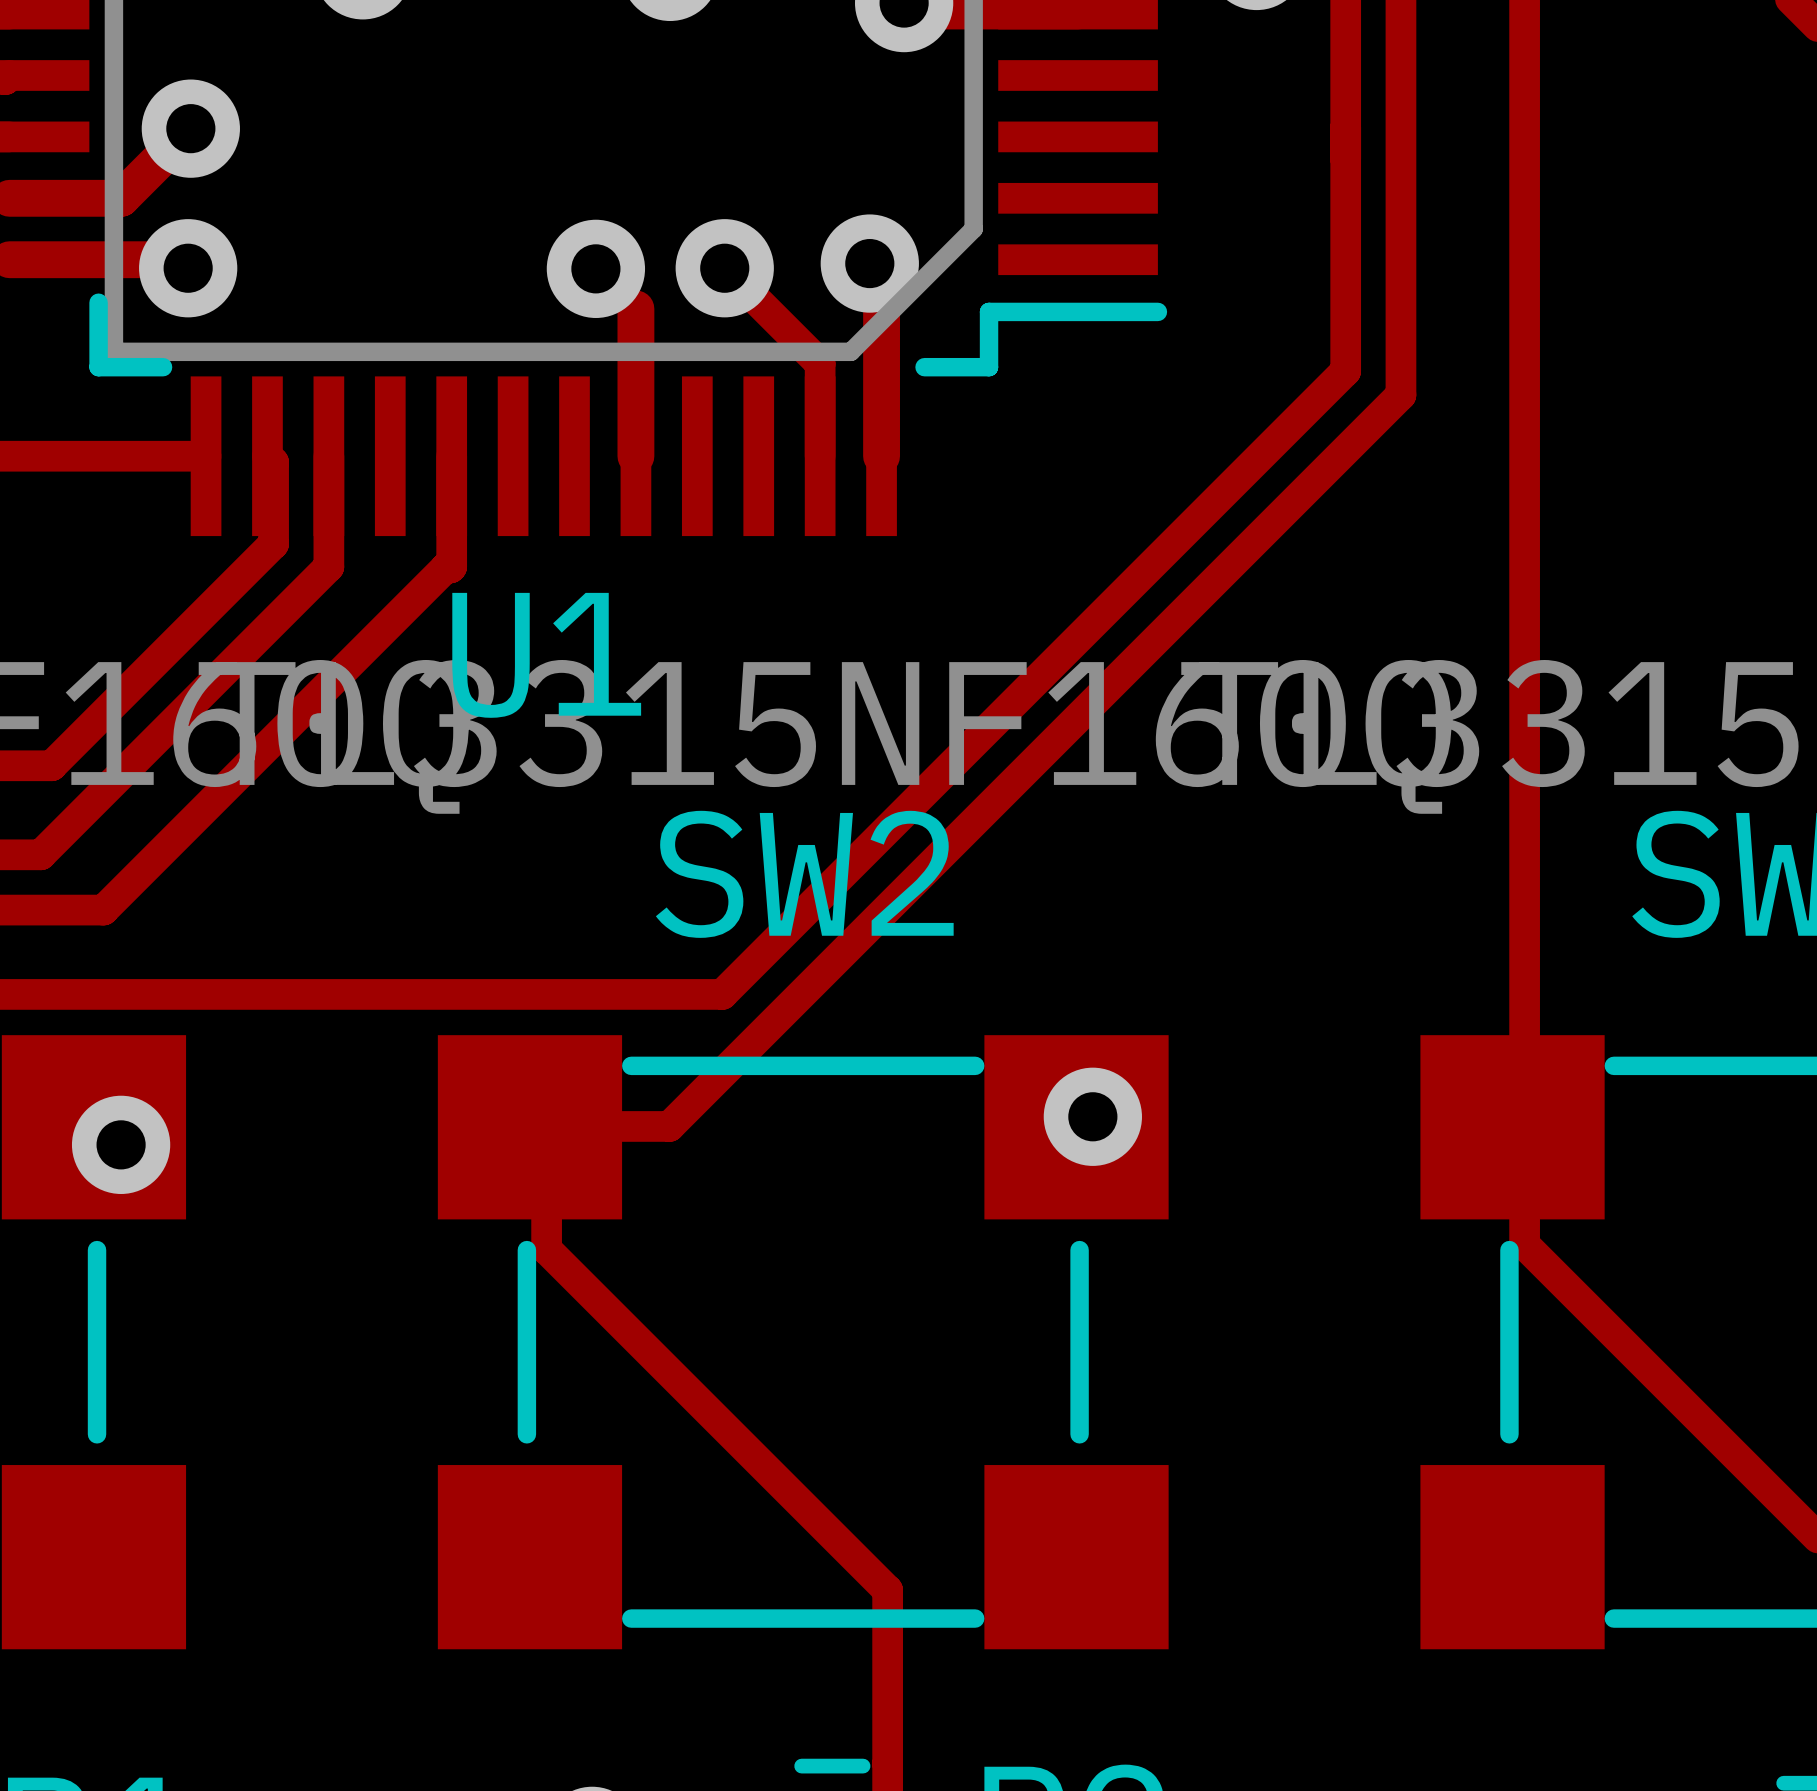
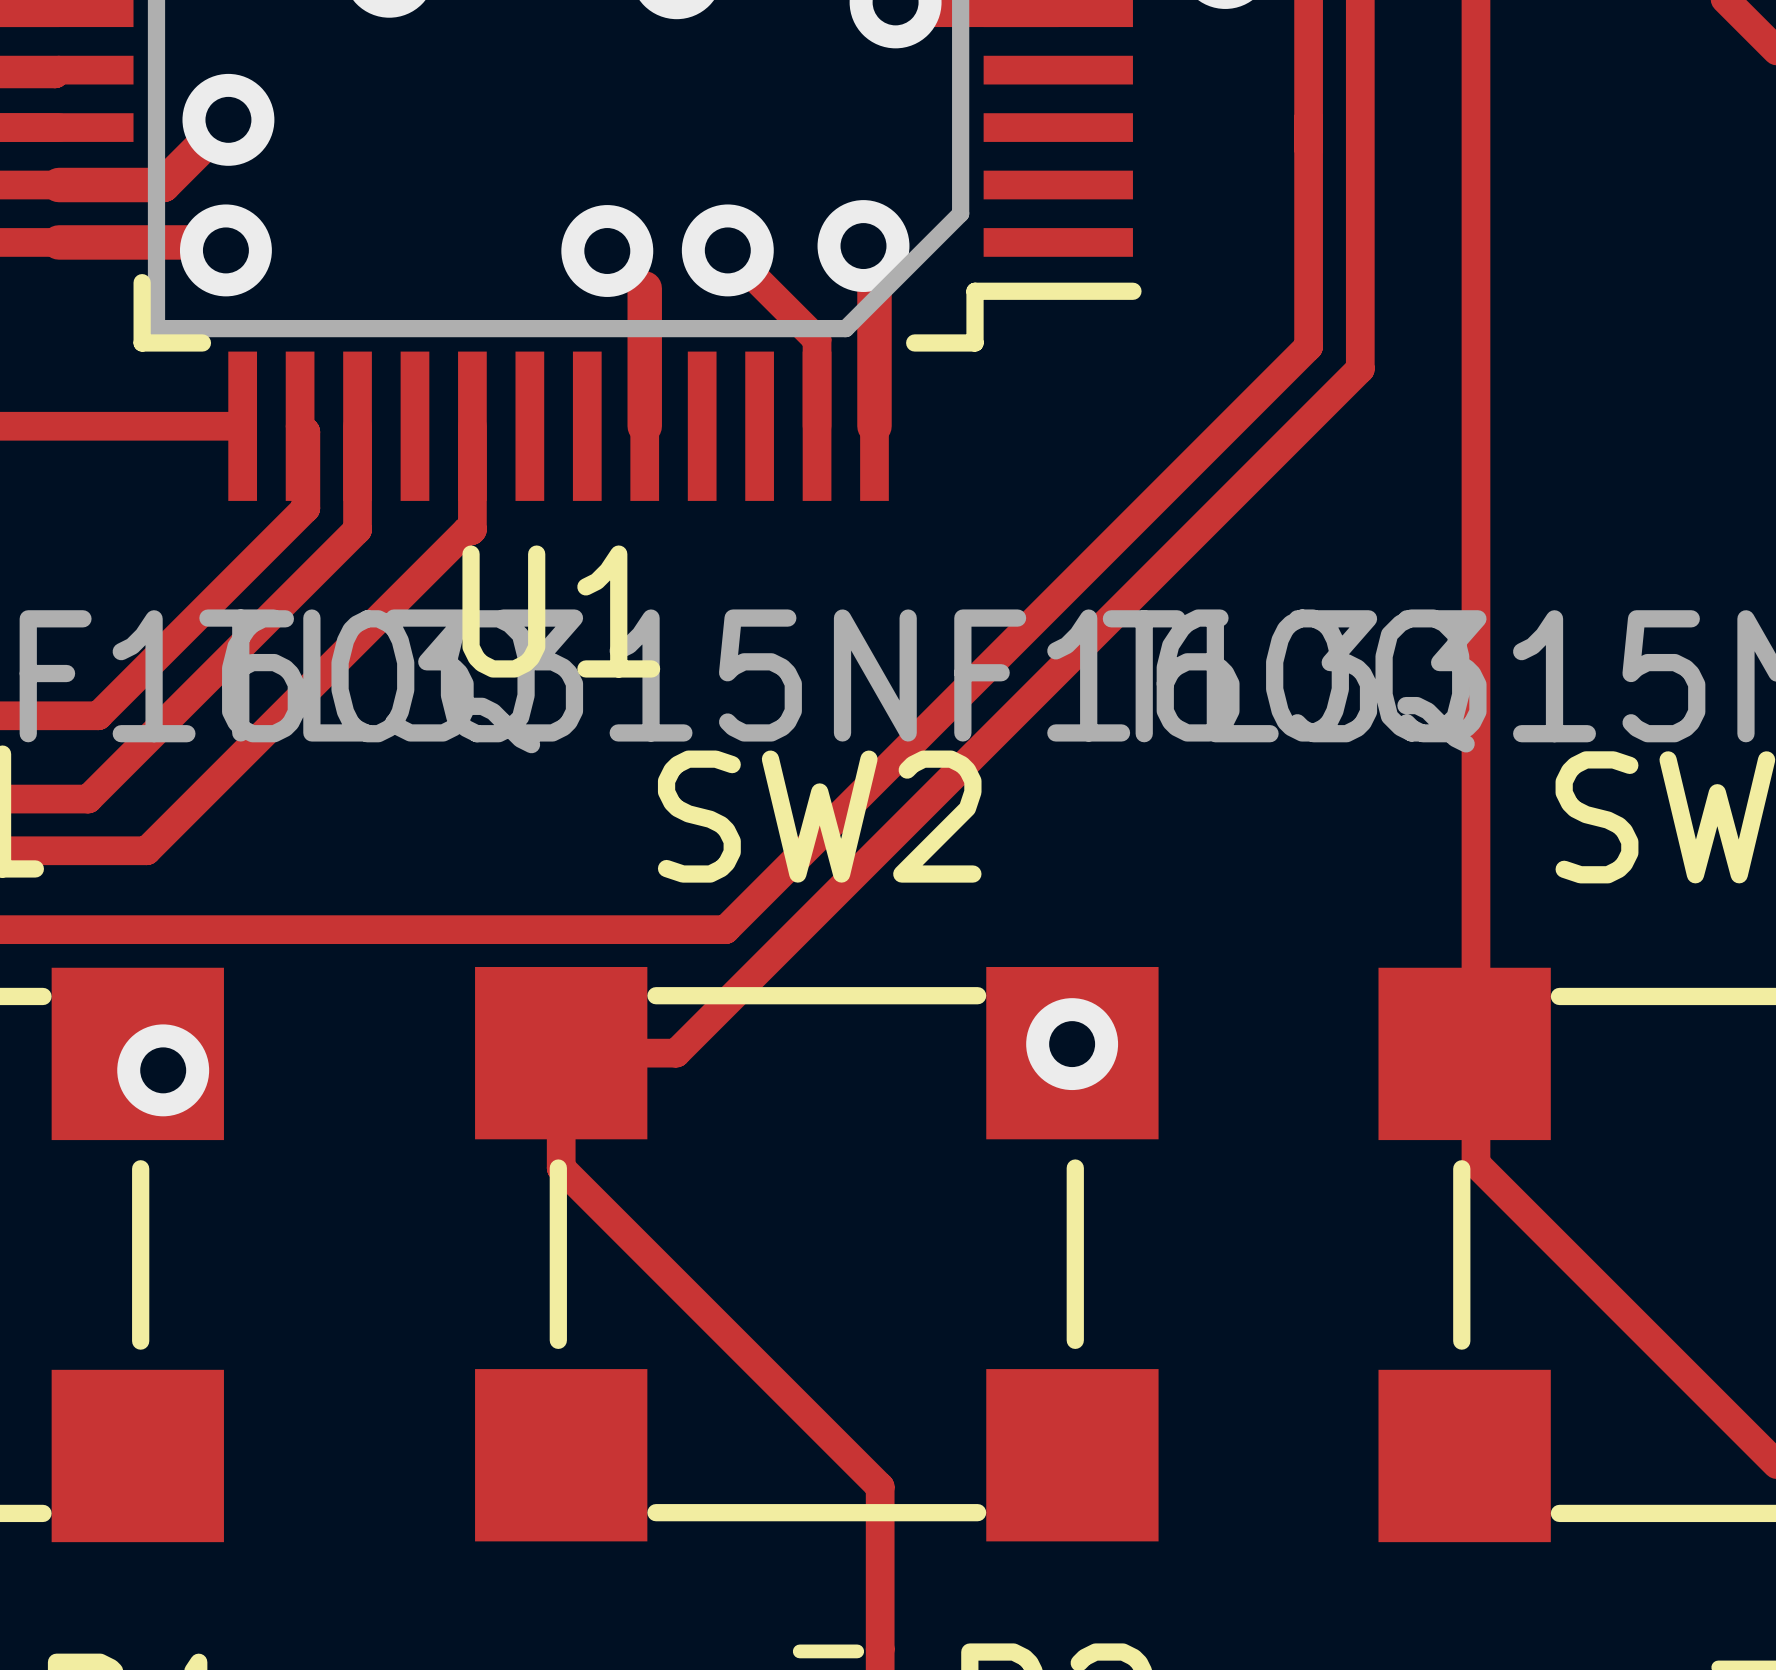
SW2 position: (803, 1342) -> (816, 1254)

